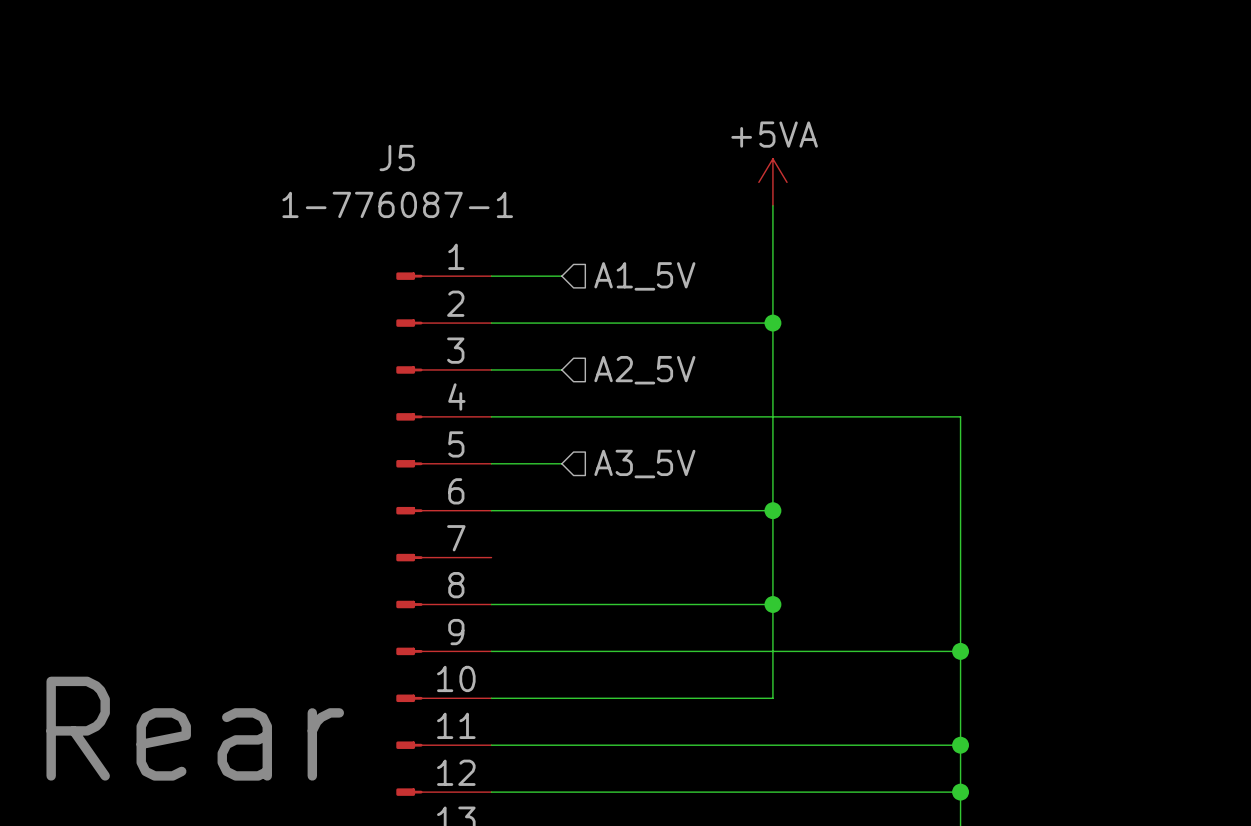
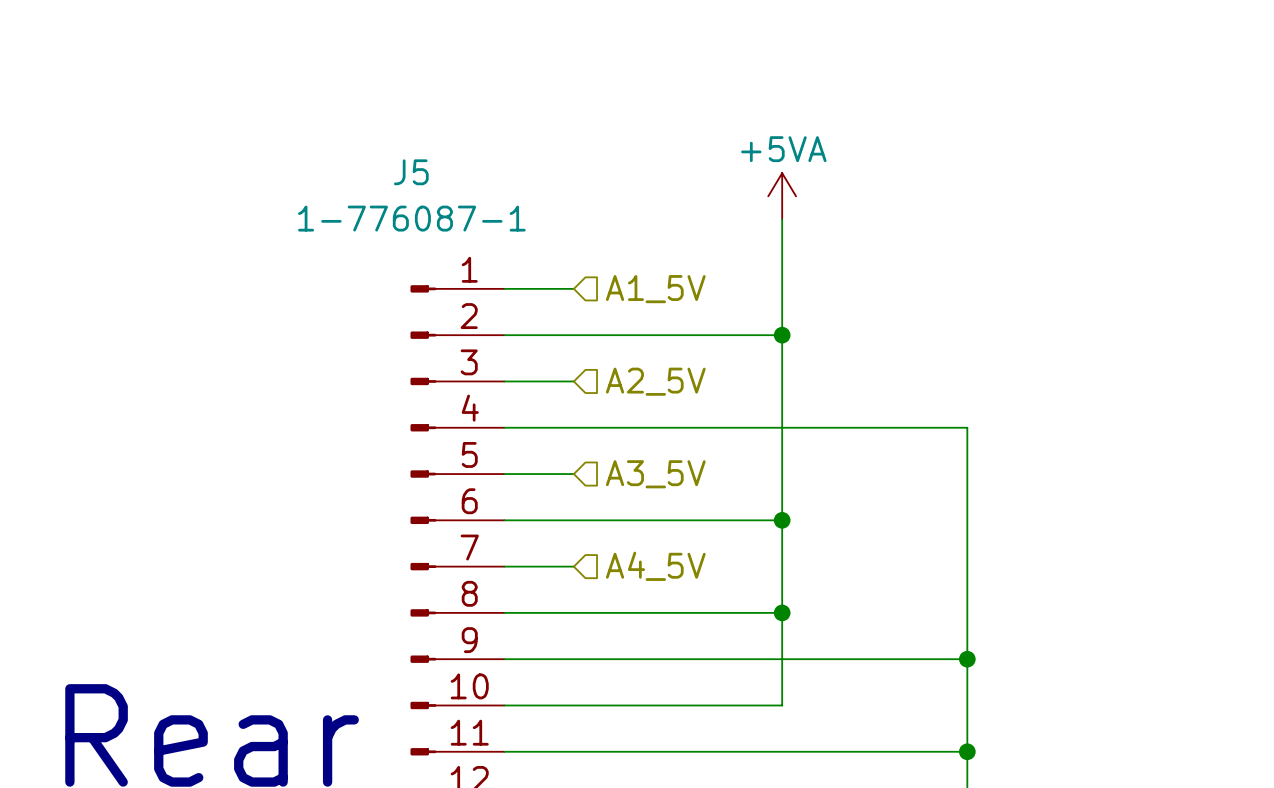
wire: none -> (504, 566) (573, 566)
hierarchical label: none -> A4_5V (655, 566)

